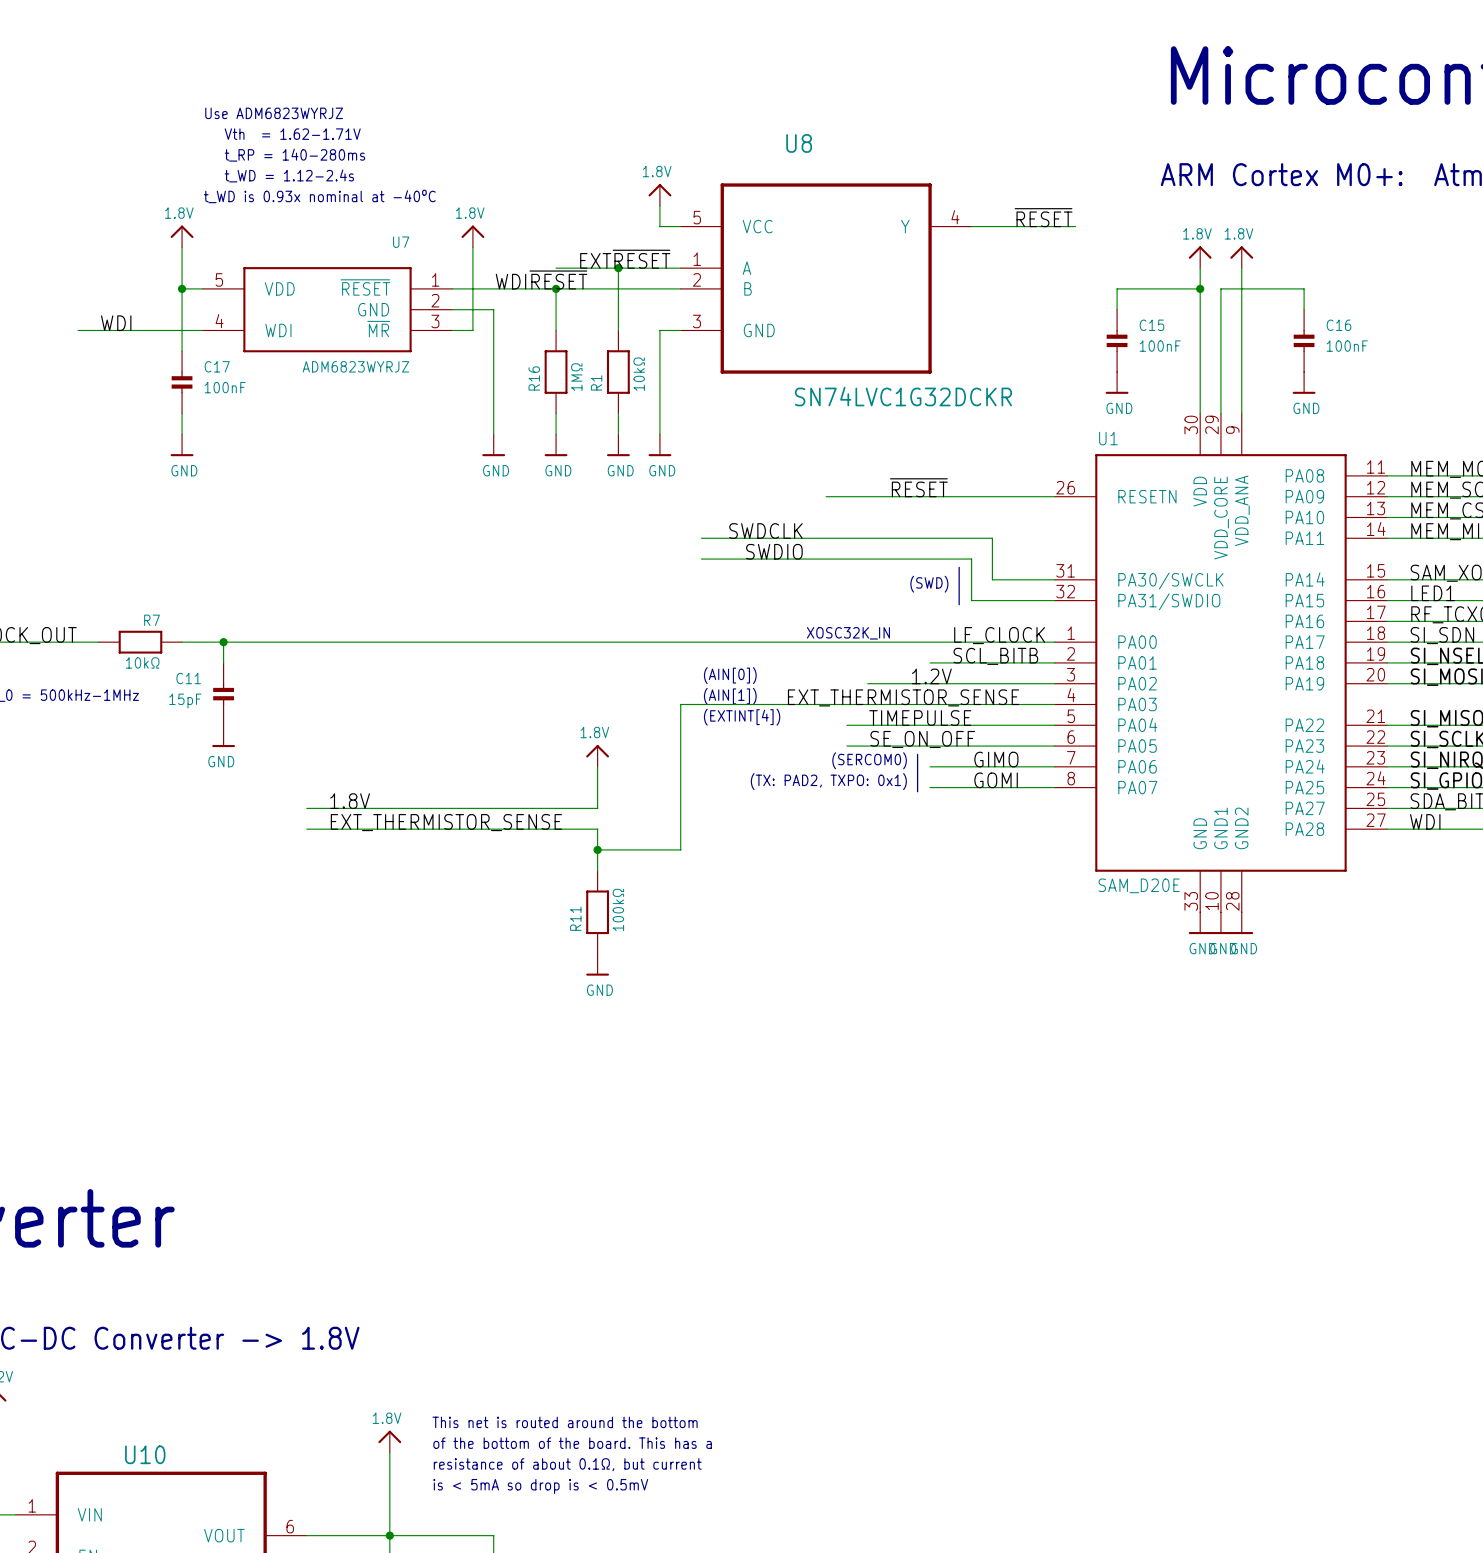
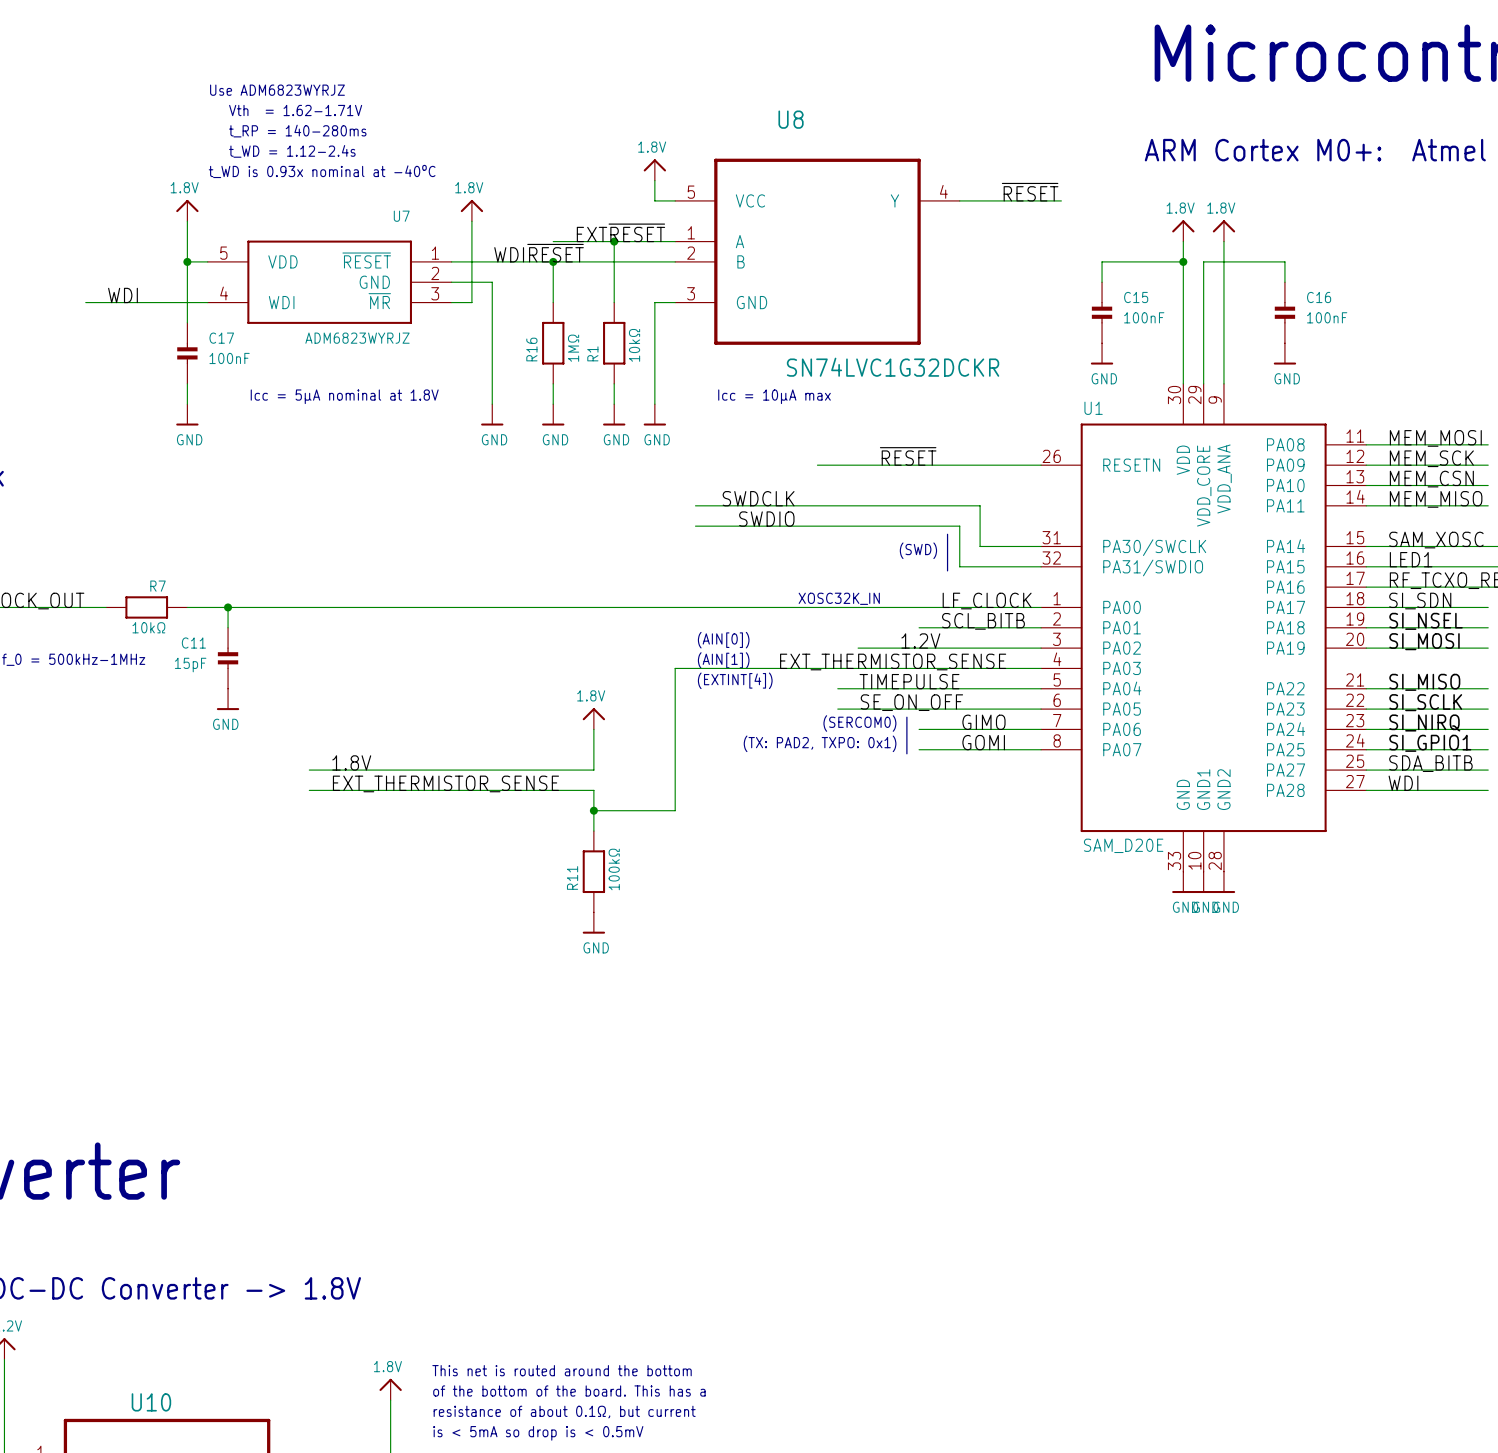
text: none -> Icc = 5µA nominal at 1.8V (344, 396)
text: none -> Icc = 10µA max (774, 396)

